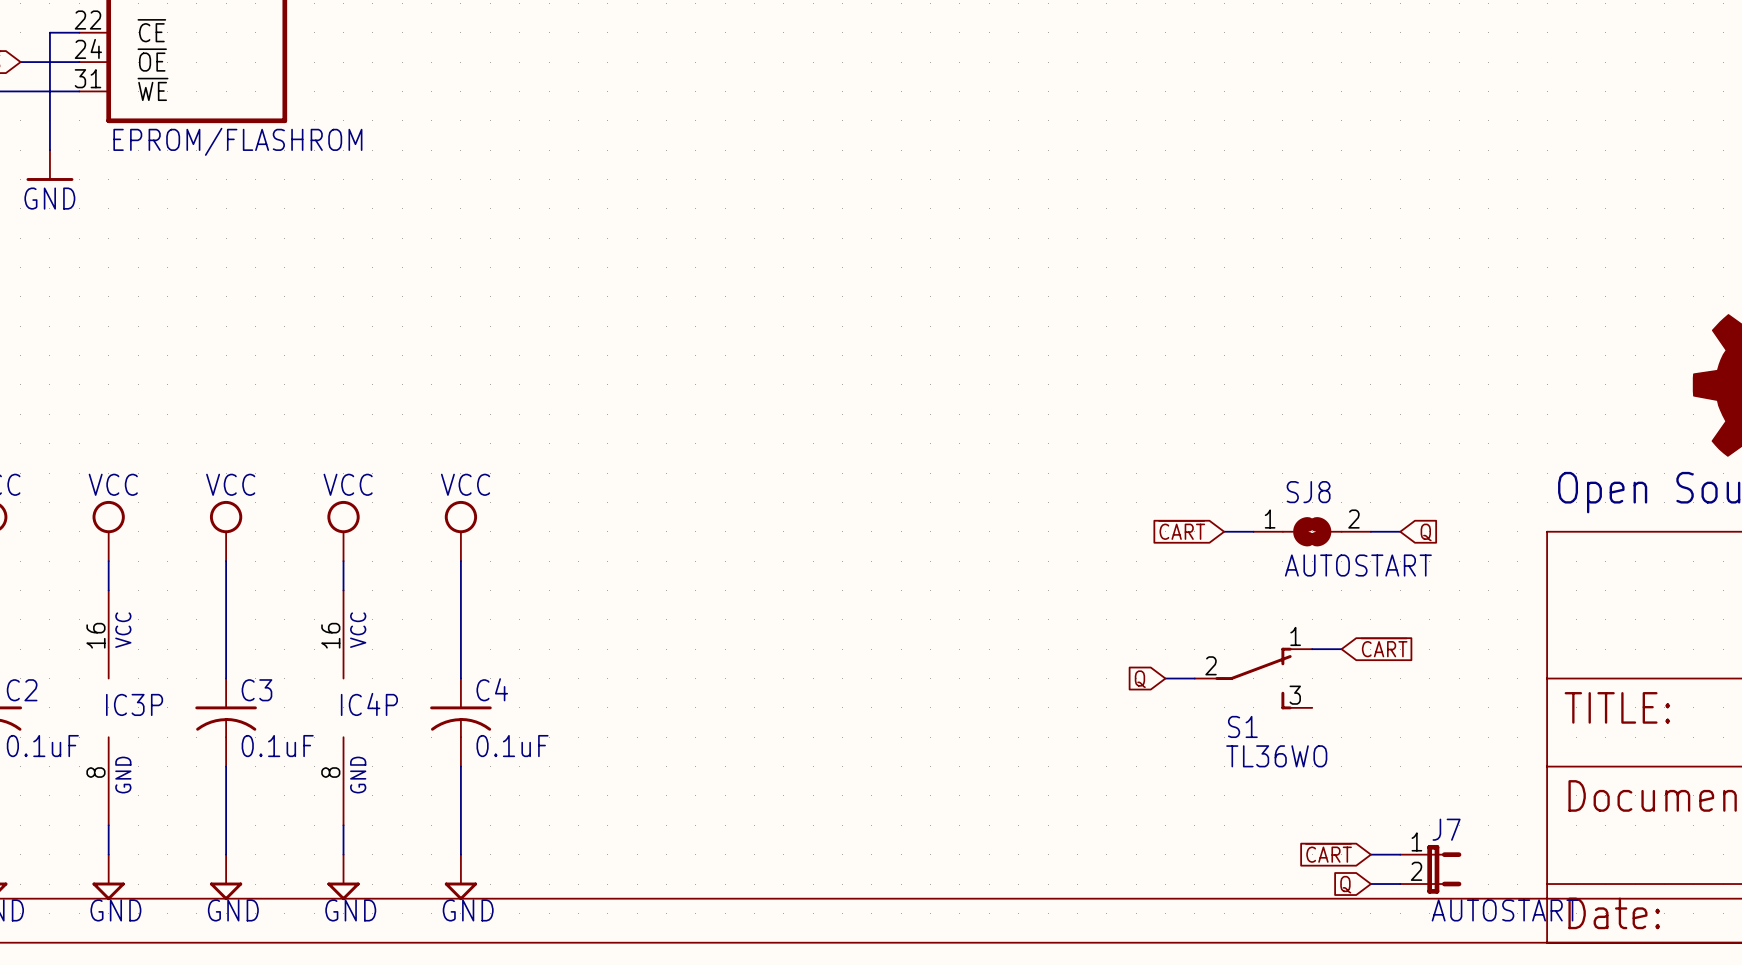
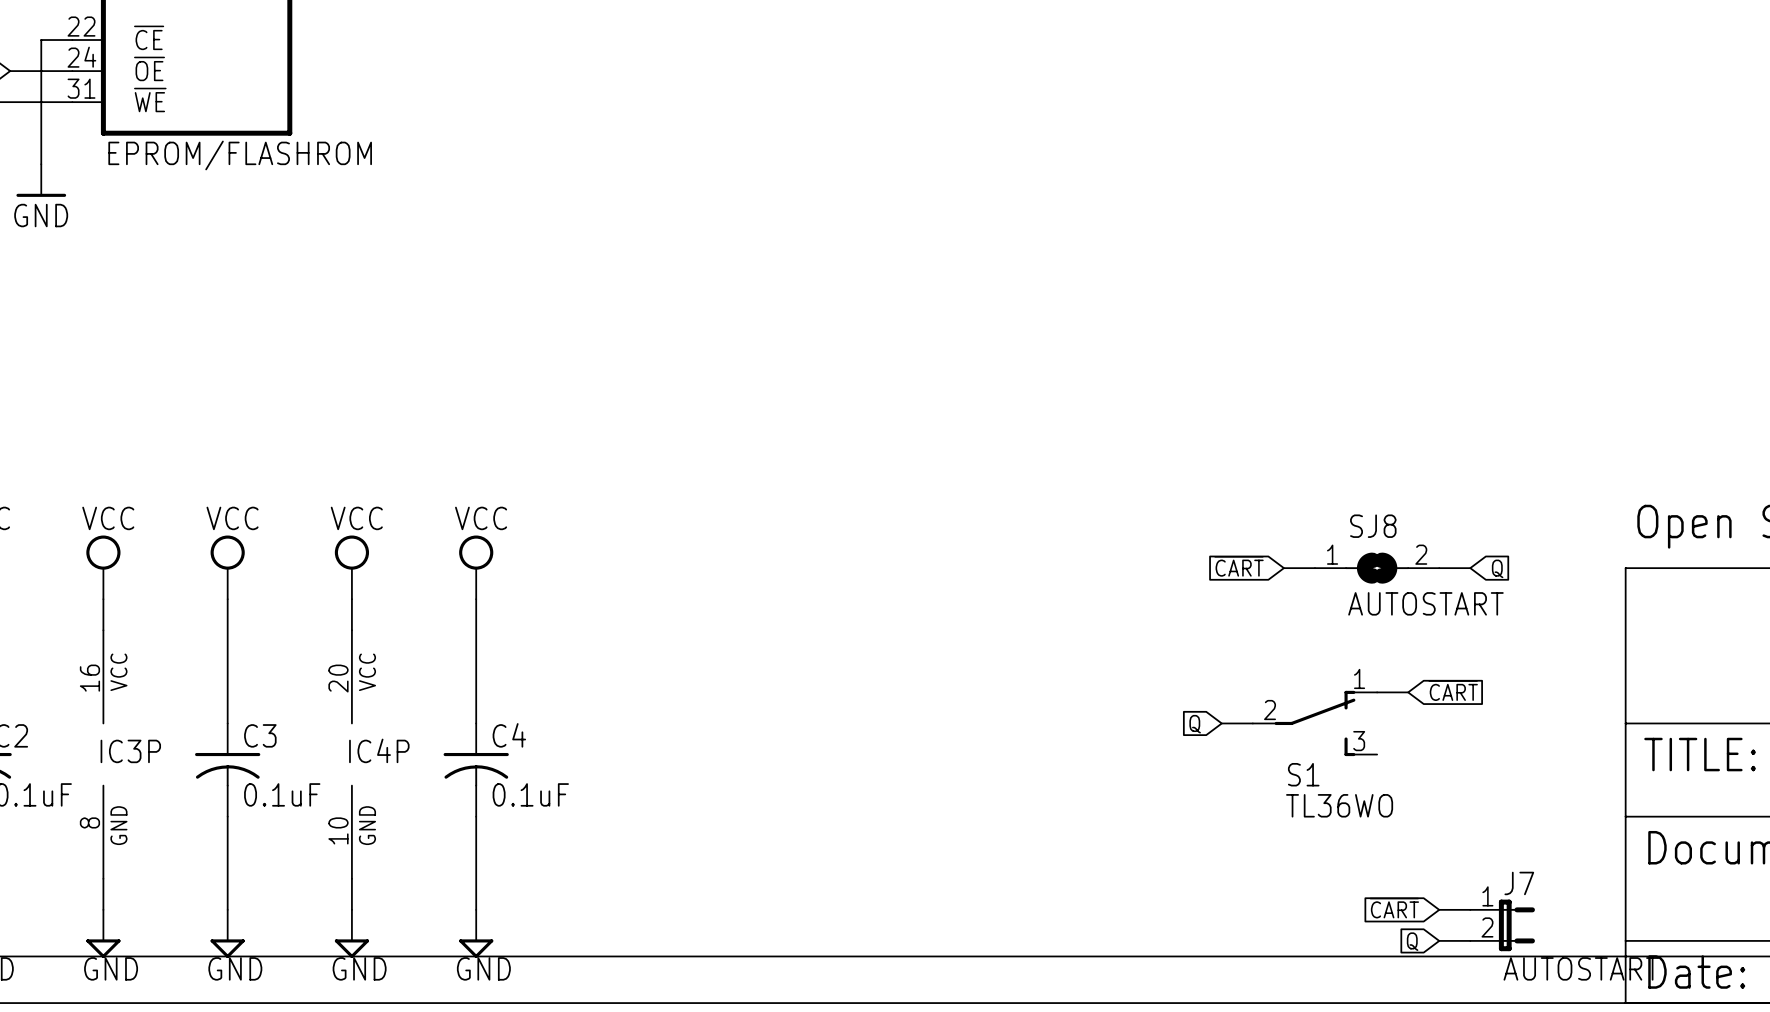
IC4P pin number: 16 (330, 635) -> 20 (338, 678)
IC4P pin number: 8 (330, 772) -> 10 (338, 830)

